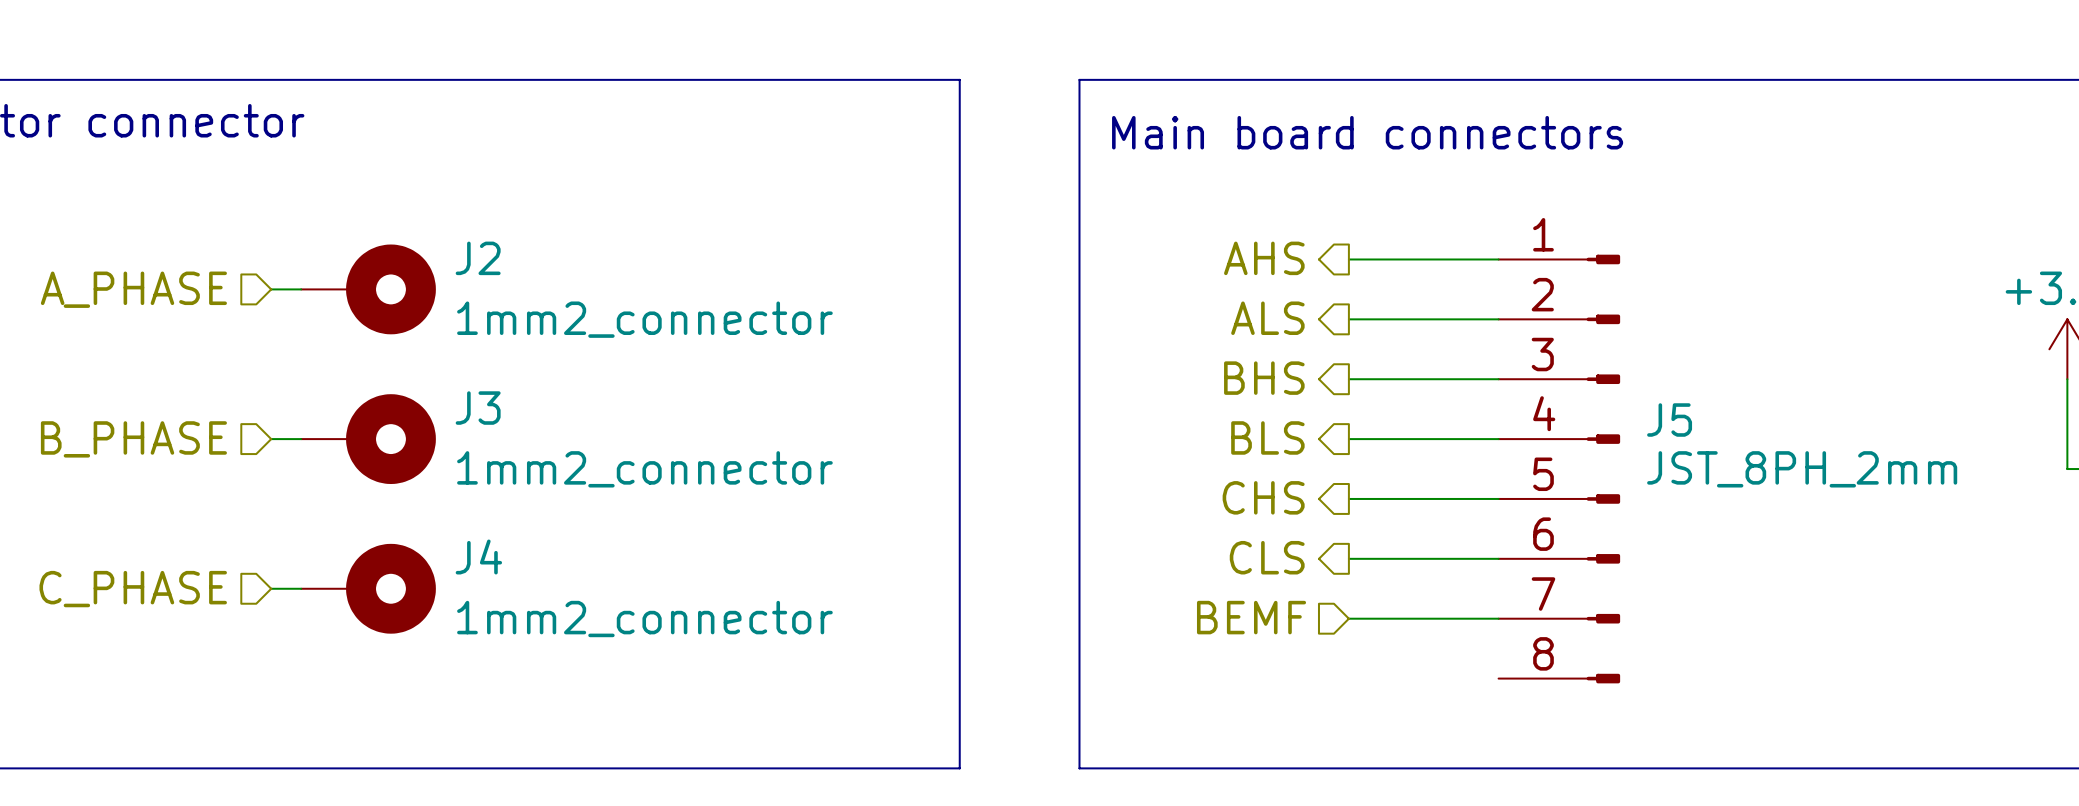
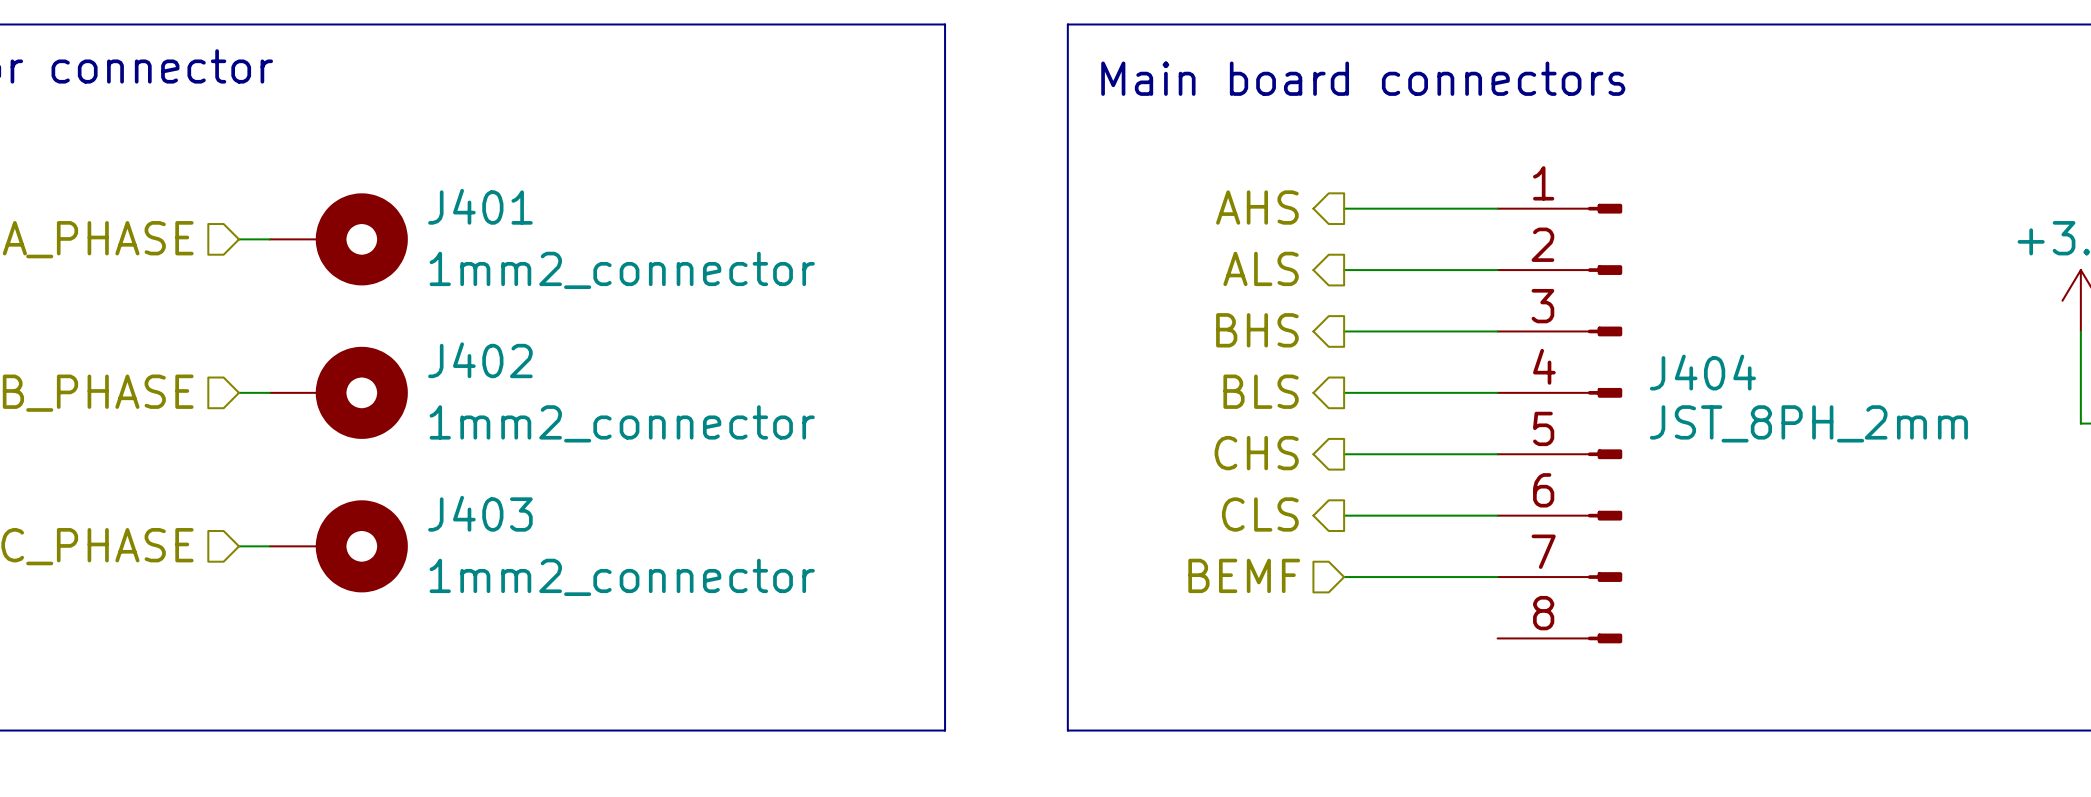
J2 name: J2 (478, 258) -> J401 (480, 206)
J3 name: J3 (478, 408) -> J402 (480, 360)
J5 name: J5 (1669, 420) -> J404 (1702, 372)
J4 name: J4 (478, 557) -> J403 (480, 513)

